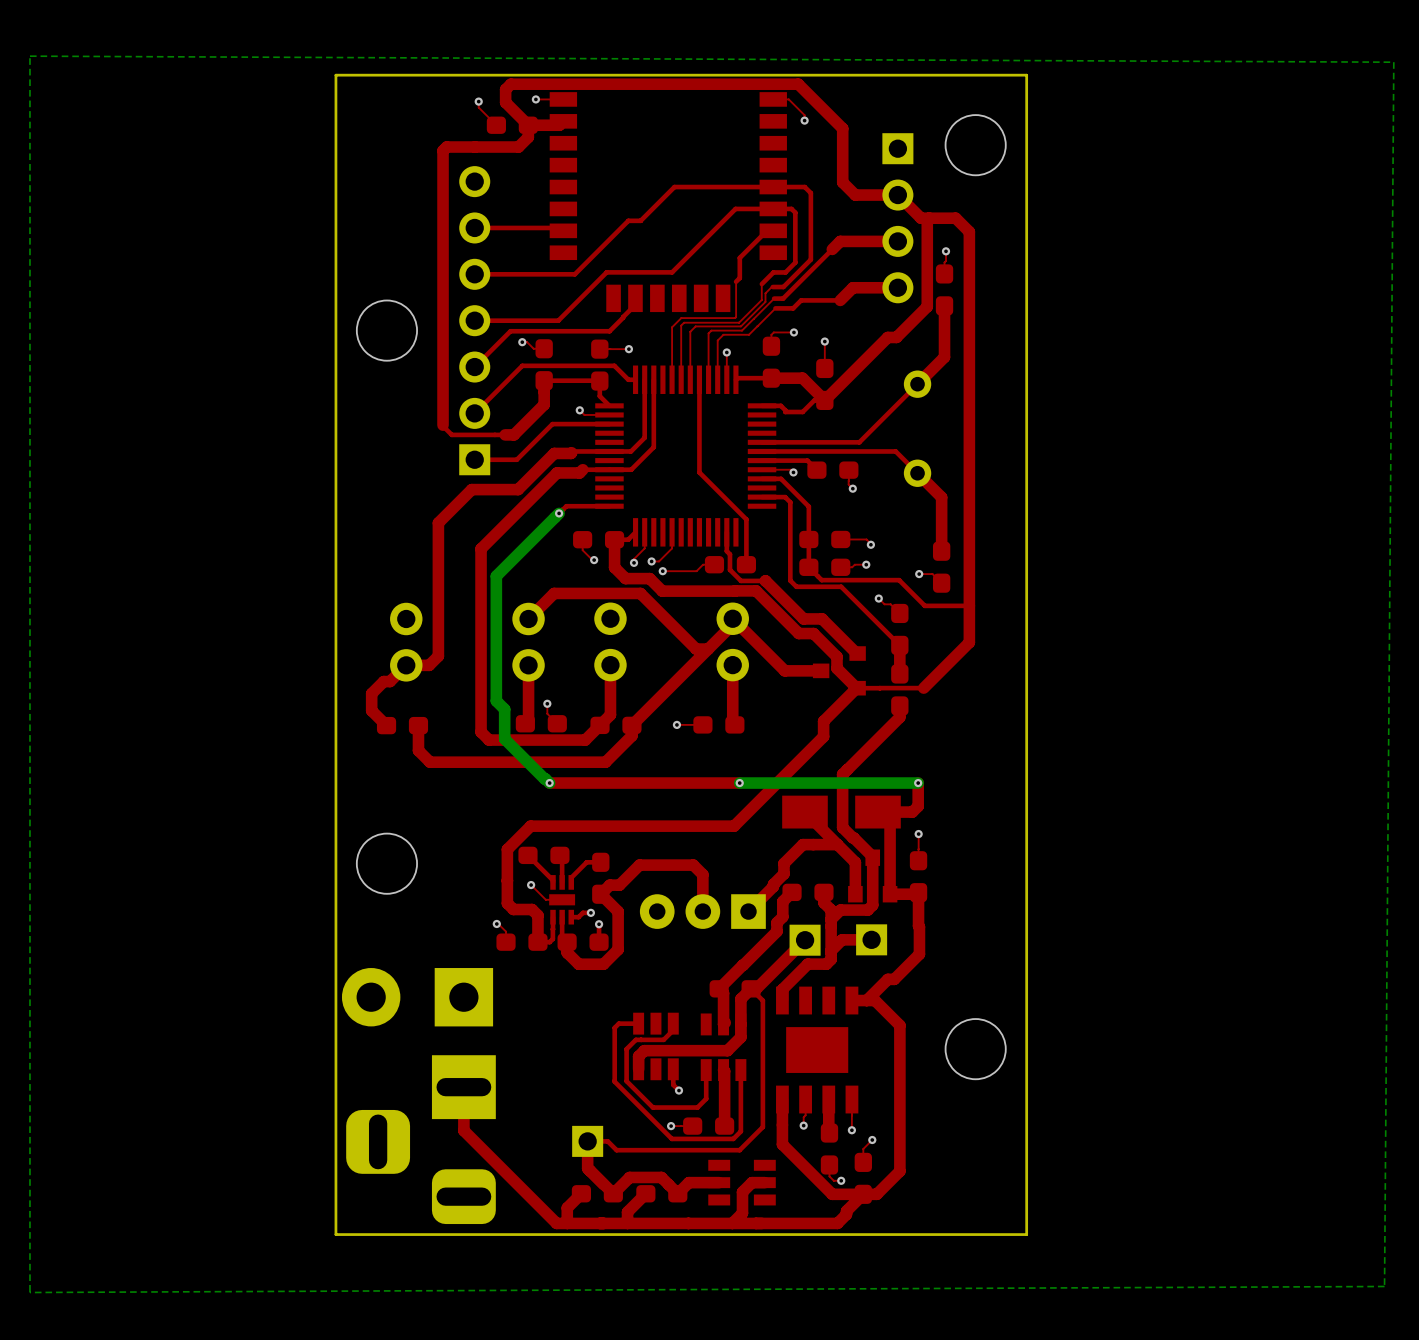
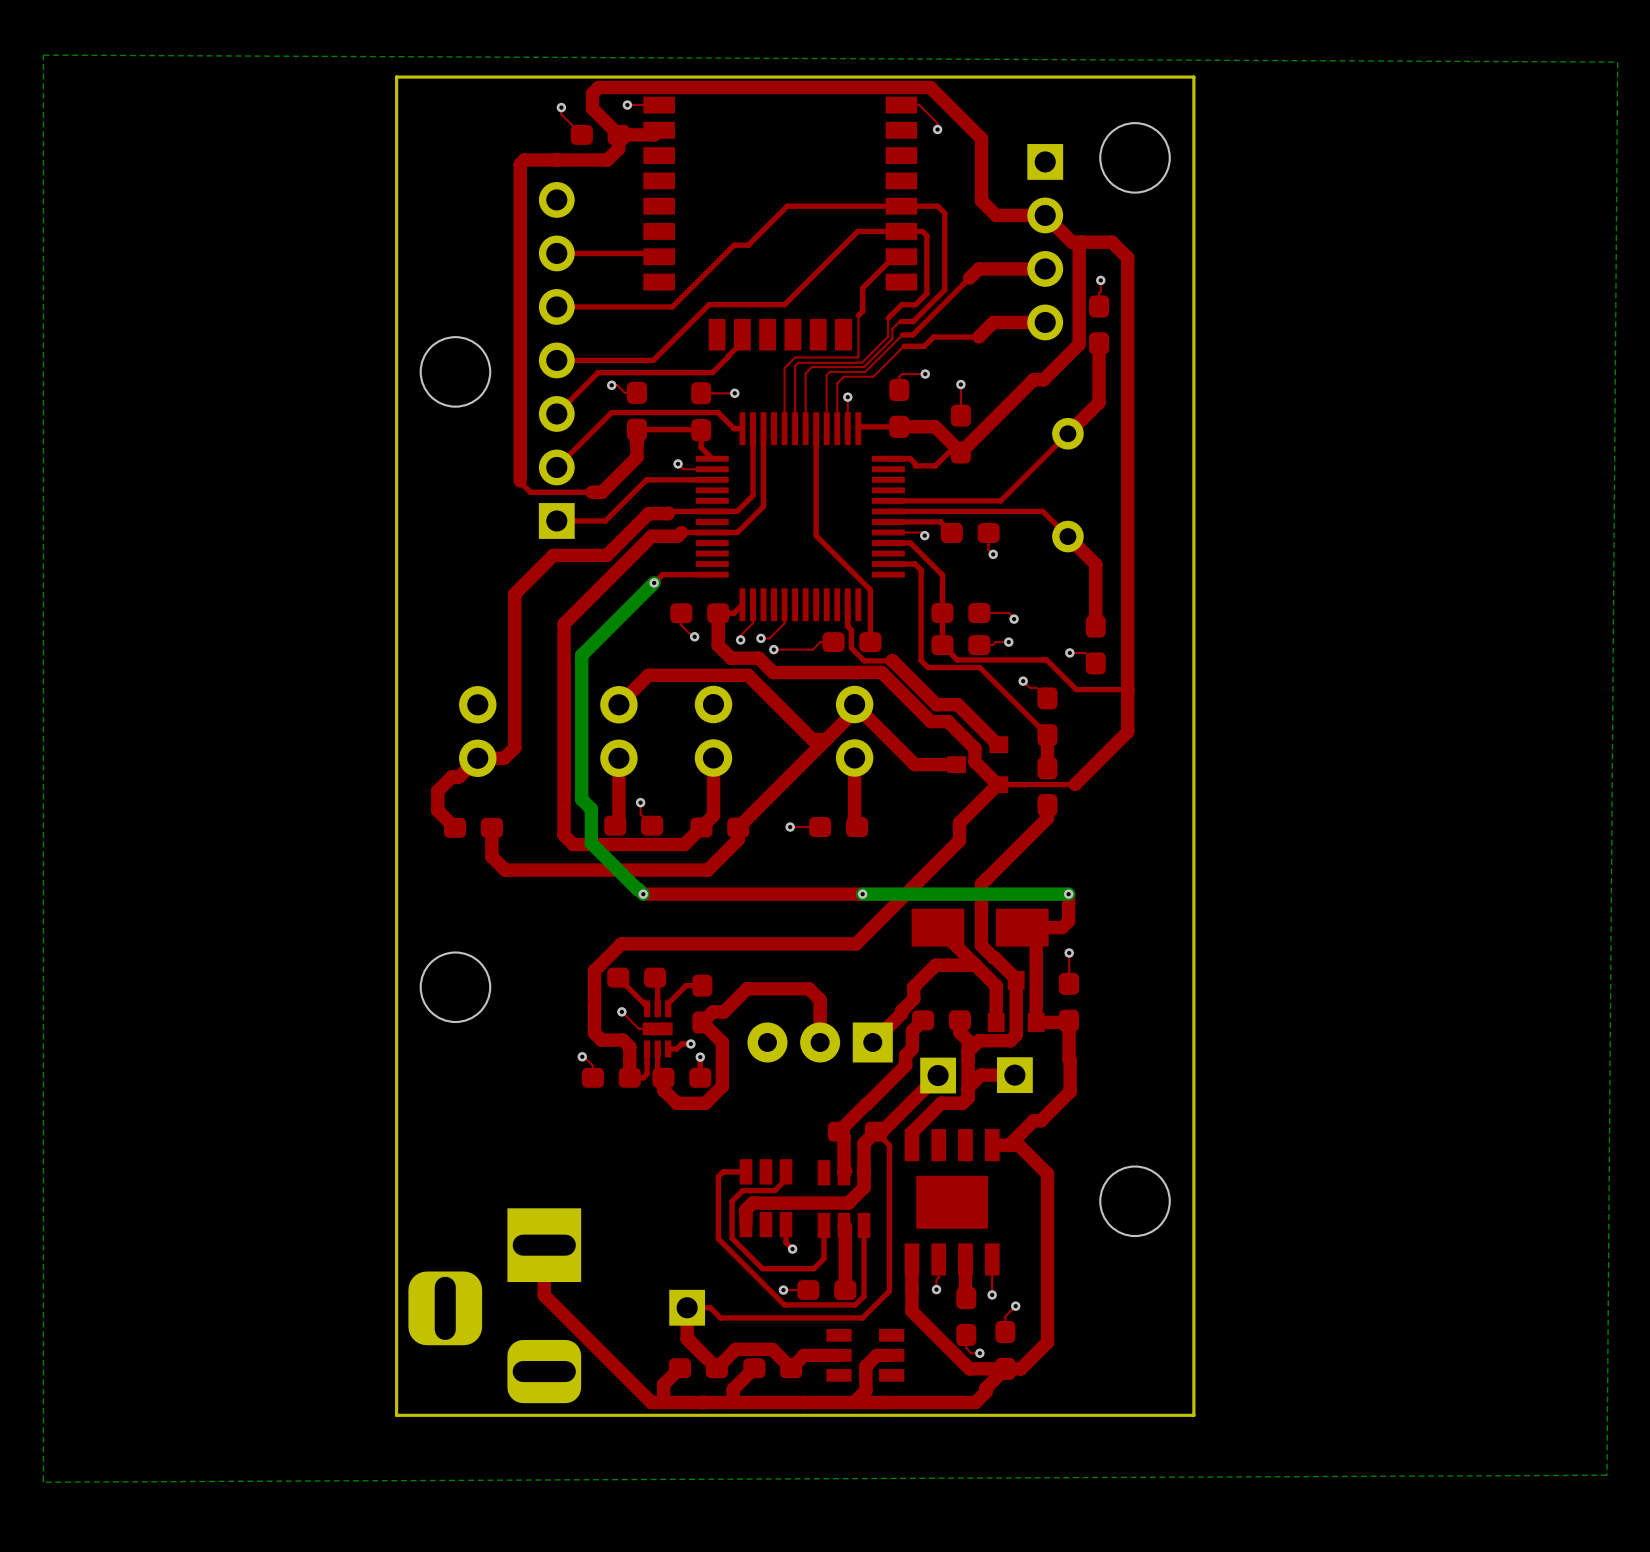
part: (417, 997) -> none

